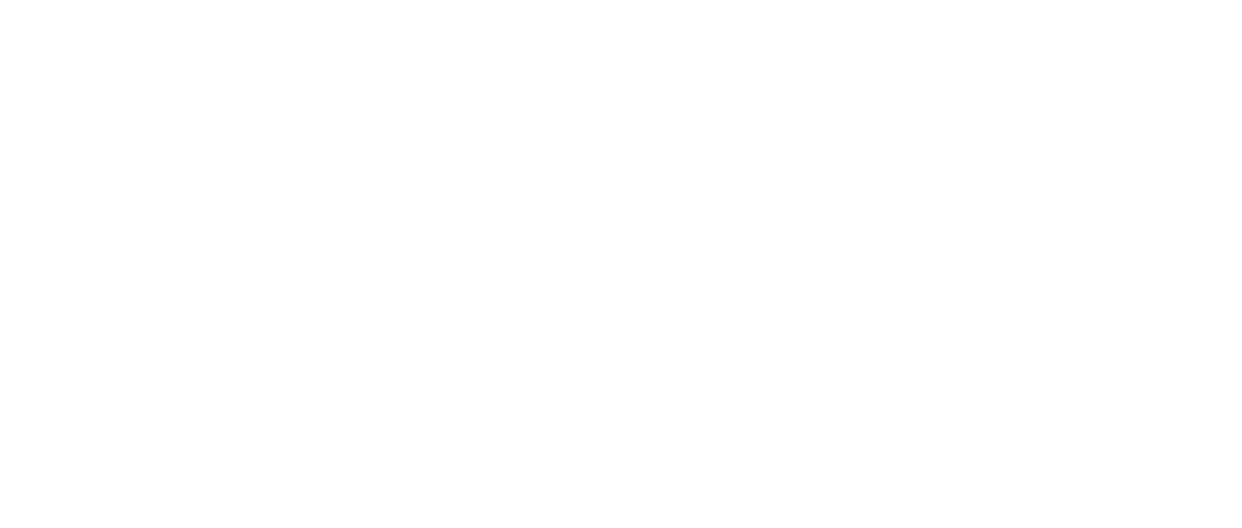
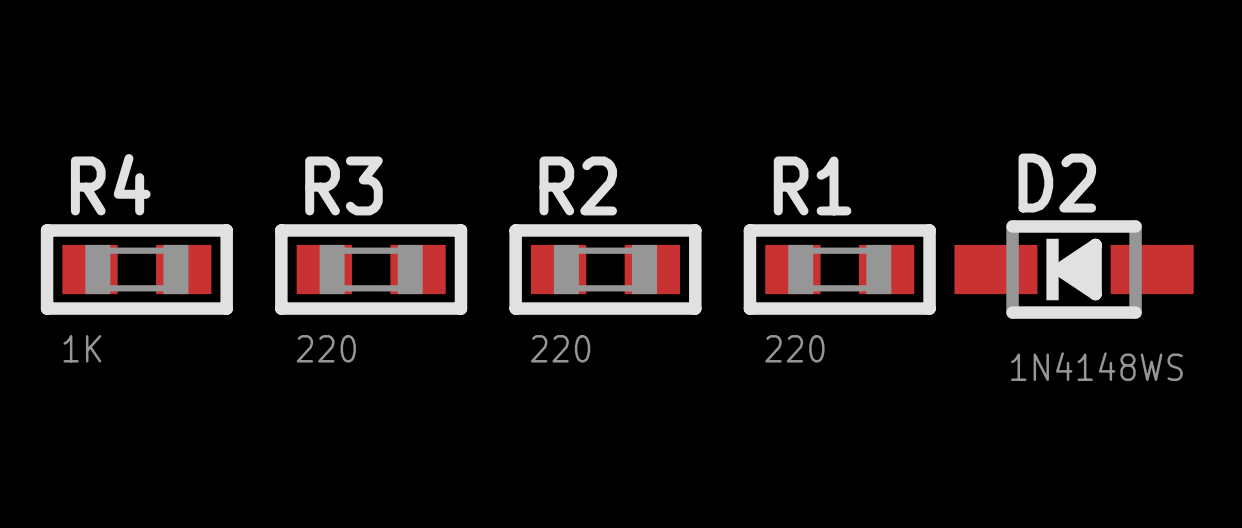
R4: none -> 1K (136, 269)
R3: none -> 220 (371, 269)
R2: none -> 220 (605, 269)
R1: none -> 220 (839, 269)
D2: none -> 1N4148WS (1074, 269)

